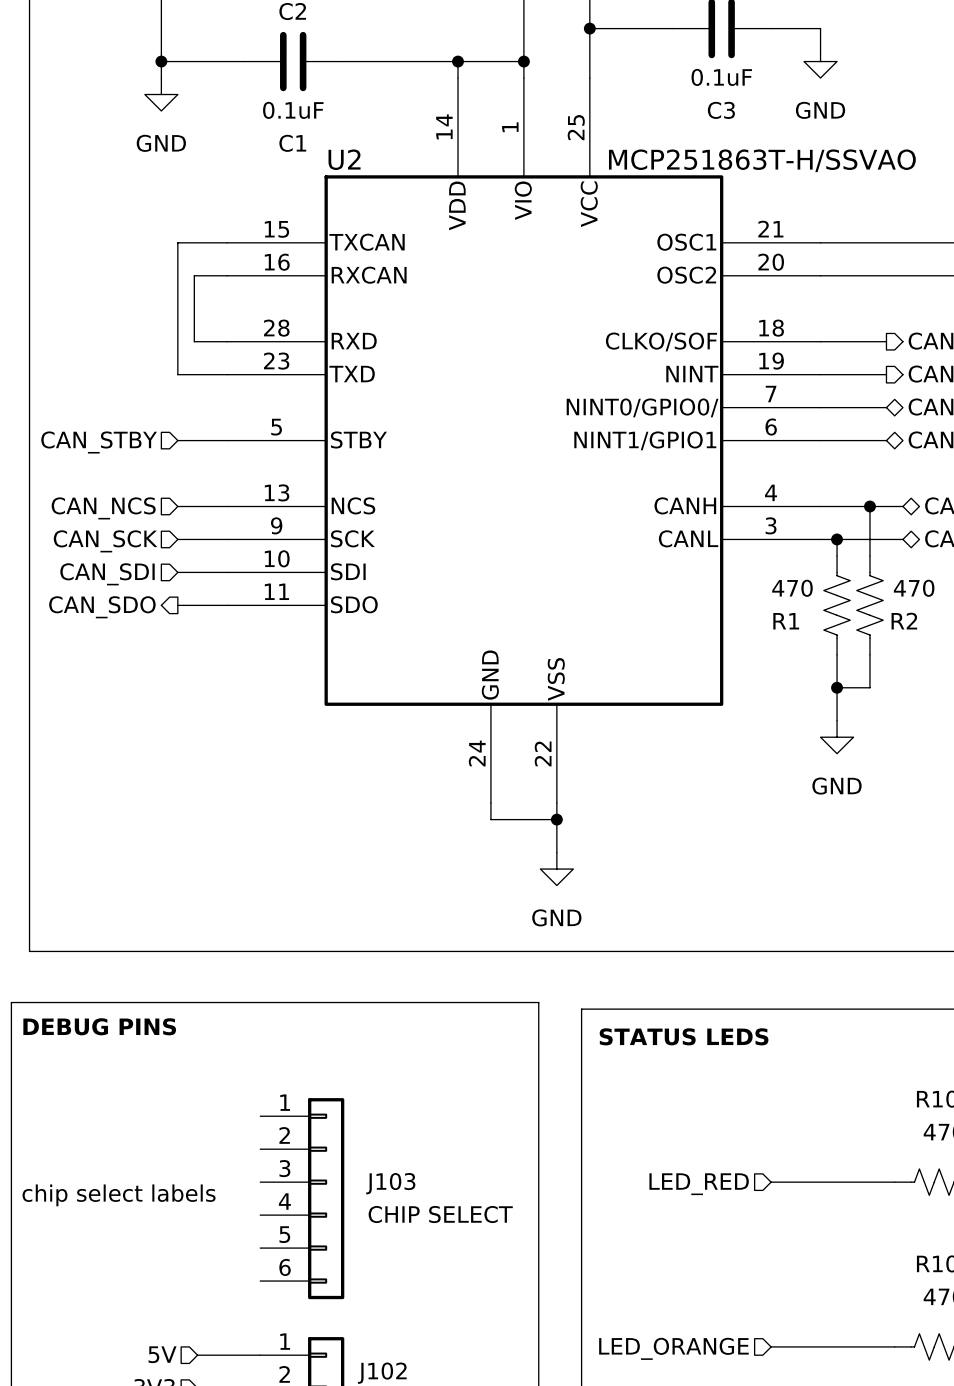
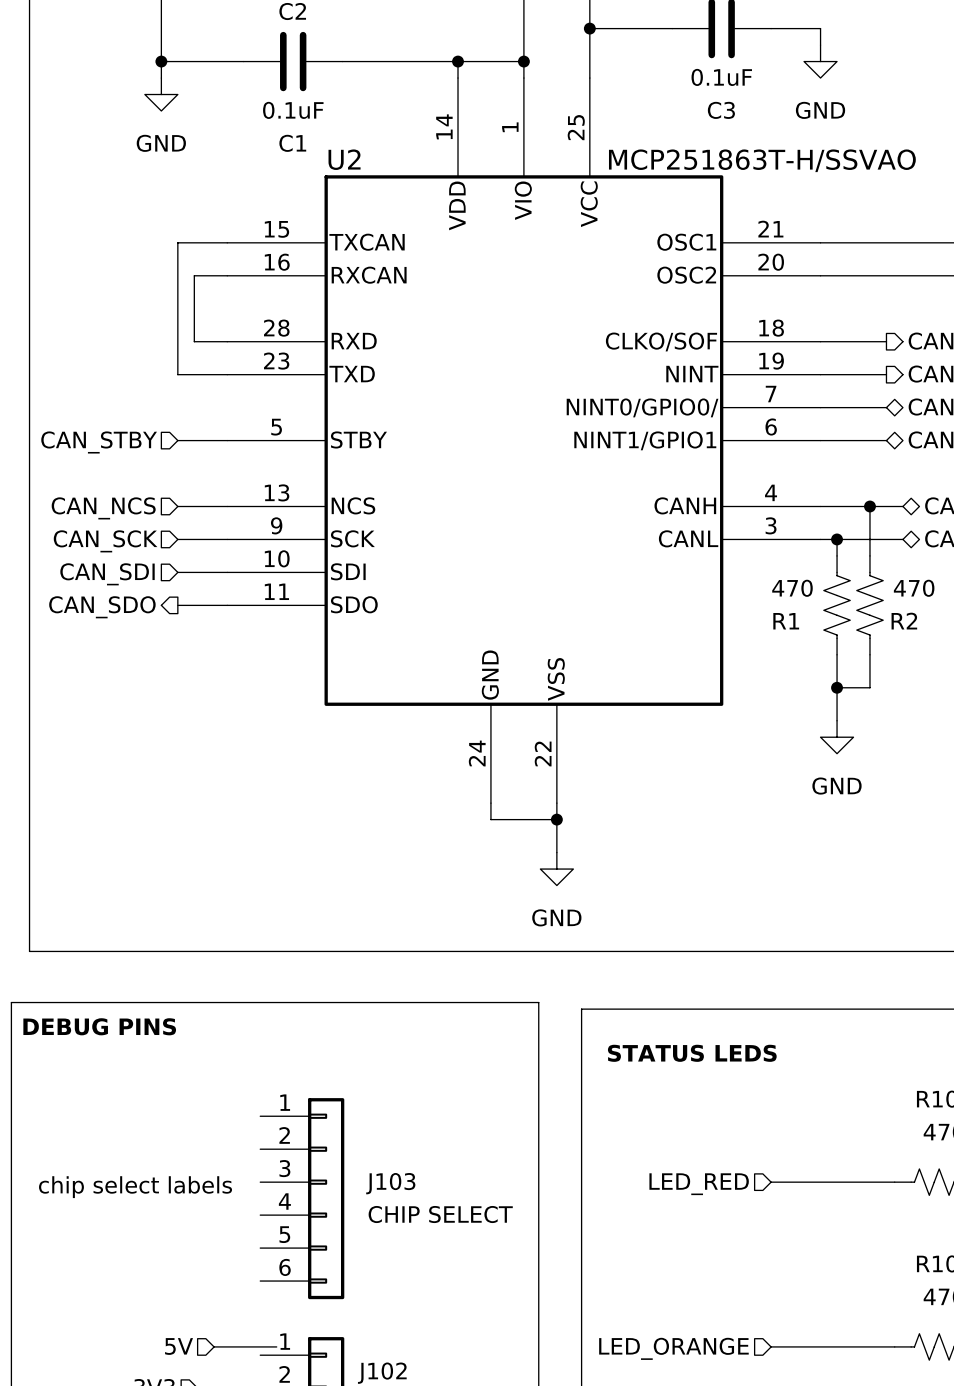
text position: STATUS LEDS (684, 1036) -> STATUS LEDS (692, 1053)
text position: chip select labels (119, 1195) -> chip select labels (135, 1187)
hierarchical label position: 5V (162, 1354) -> 5V (179, 1346)
wire: (197, 1355) (260, 1355) -> (214, 1346) (276, 1346)

